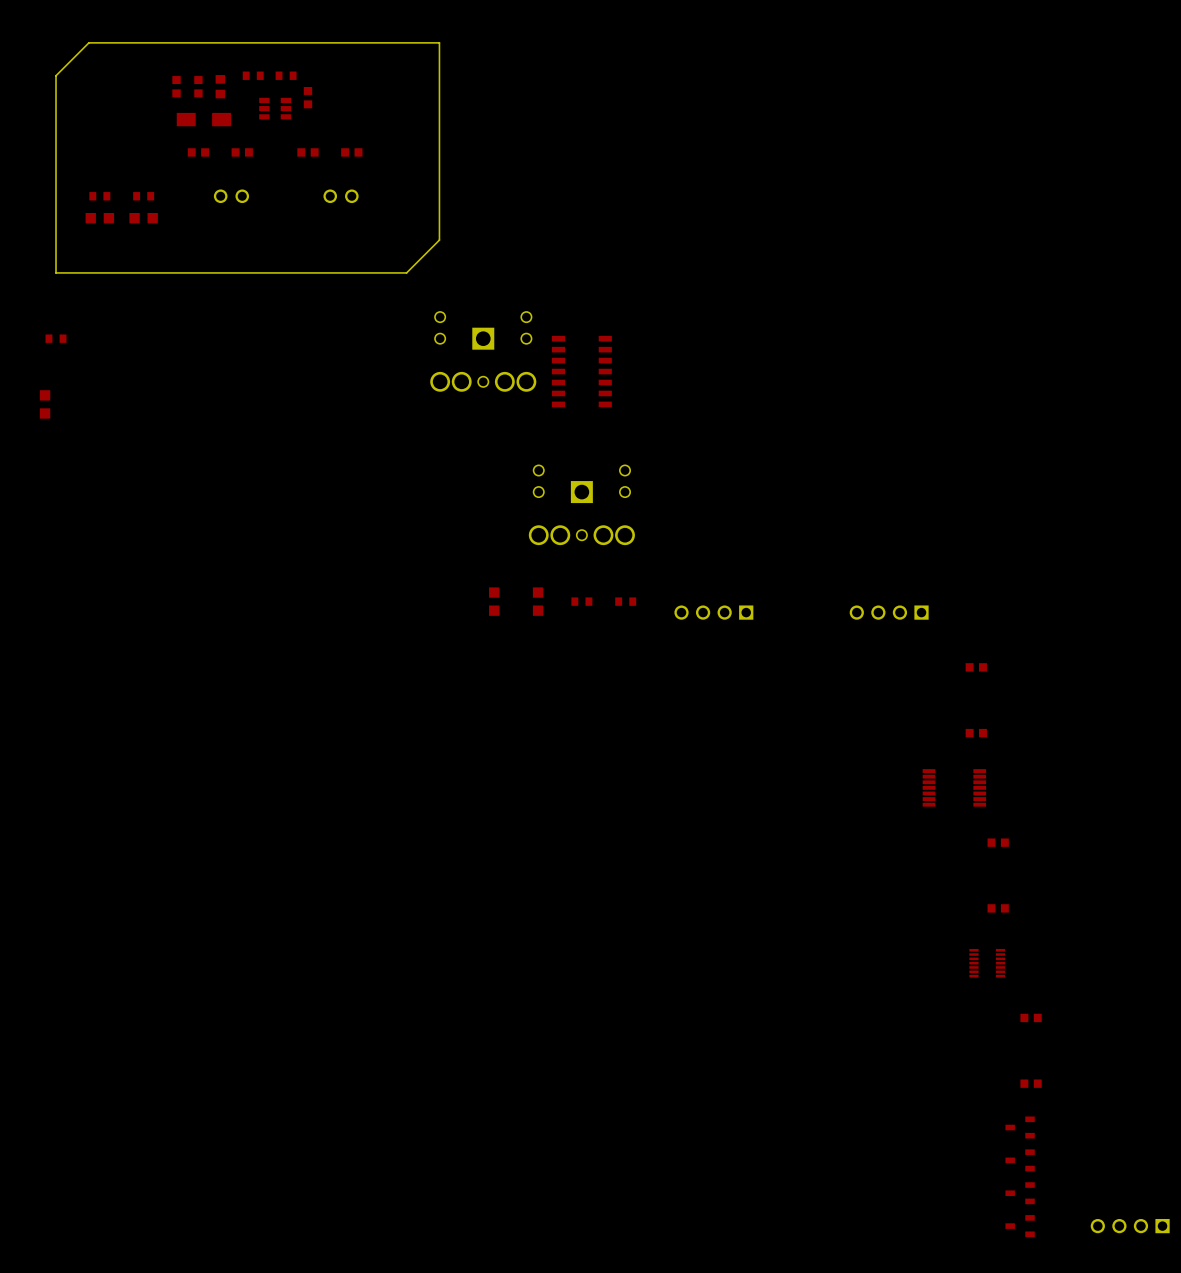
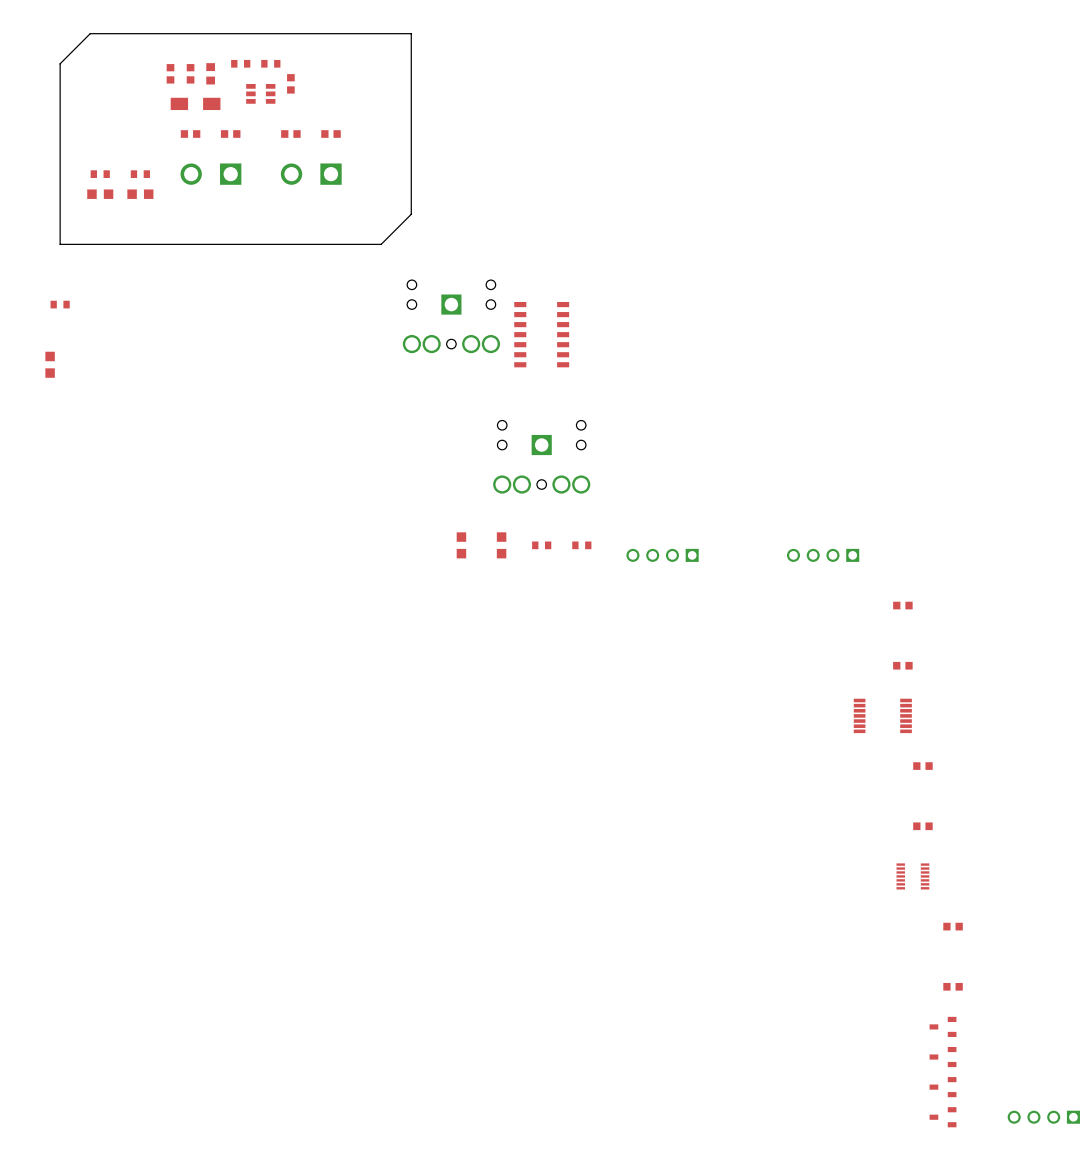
part: none -> (210, 174)
part: (231, 196) -> none
part: none -> (311, 174)
part: (341, 196) -> none

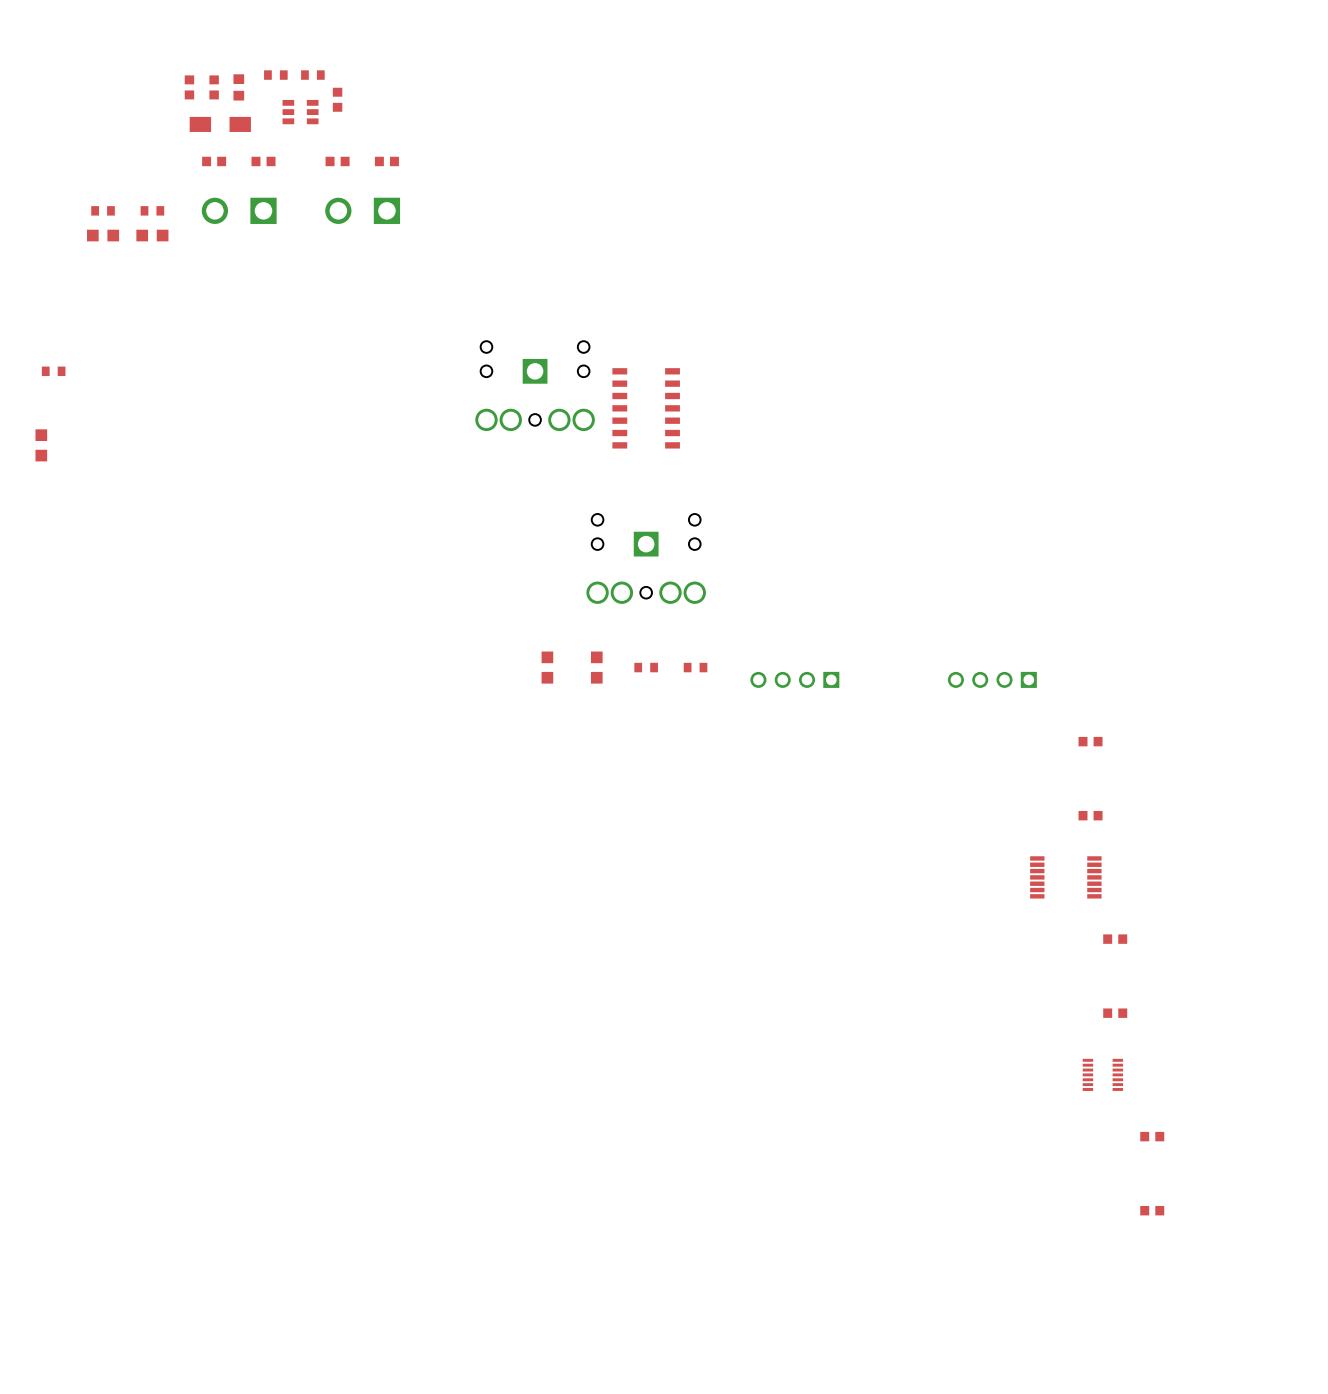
board edge: (411, 33) (90, 33) (60, 63) (60, 244) (381, 244) (411, 214) (411, 33) -> none
part: (943, 1026) -> none
part: (943, 1057) -> none
part: (943, 1087) -> none
part: (943, 1117) -> none
part: (1043, 1117) -> none

